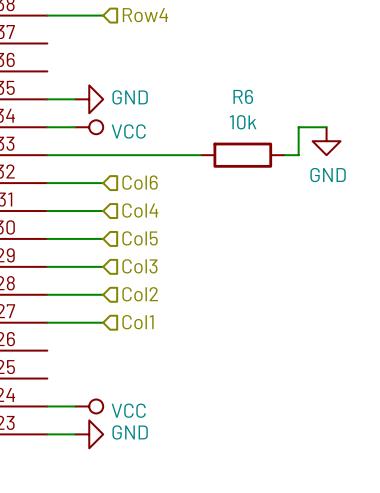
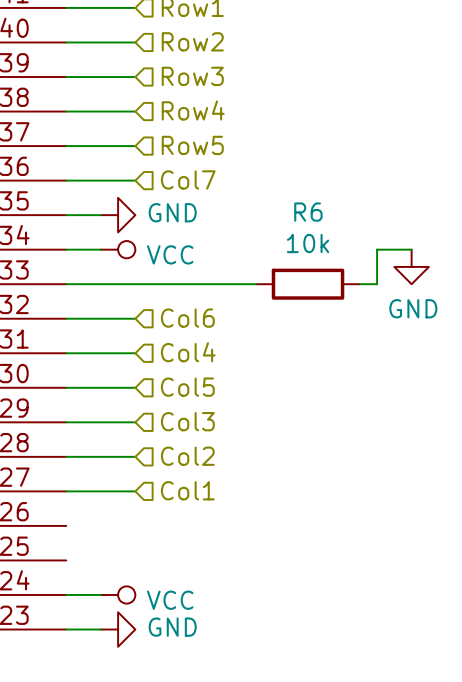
wire: none -> (66, 146) (135, 146)
hierarchical label: none -> Row5 (192, 145)
hierarchical label: none -> Col7 (188, 179)
wire: none -> (66, 180) (135, 180)

